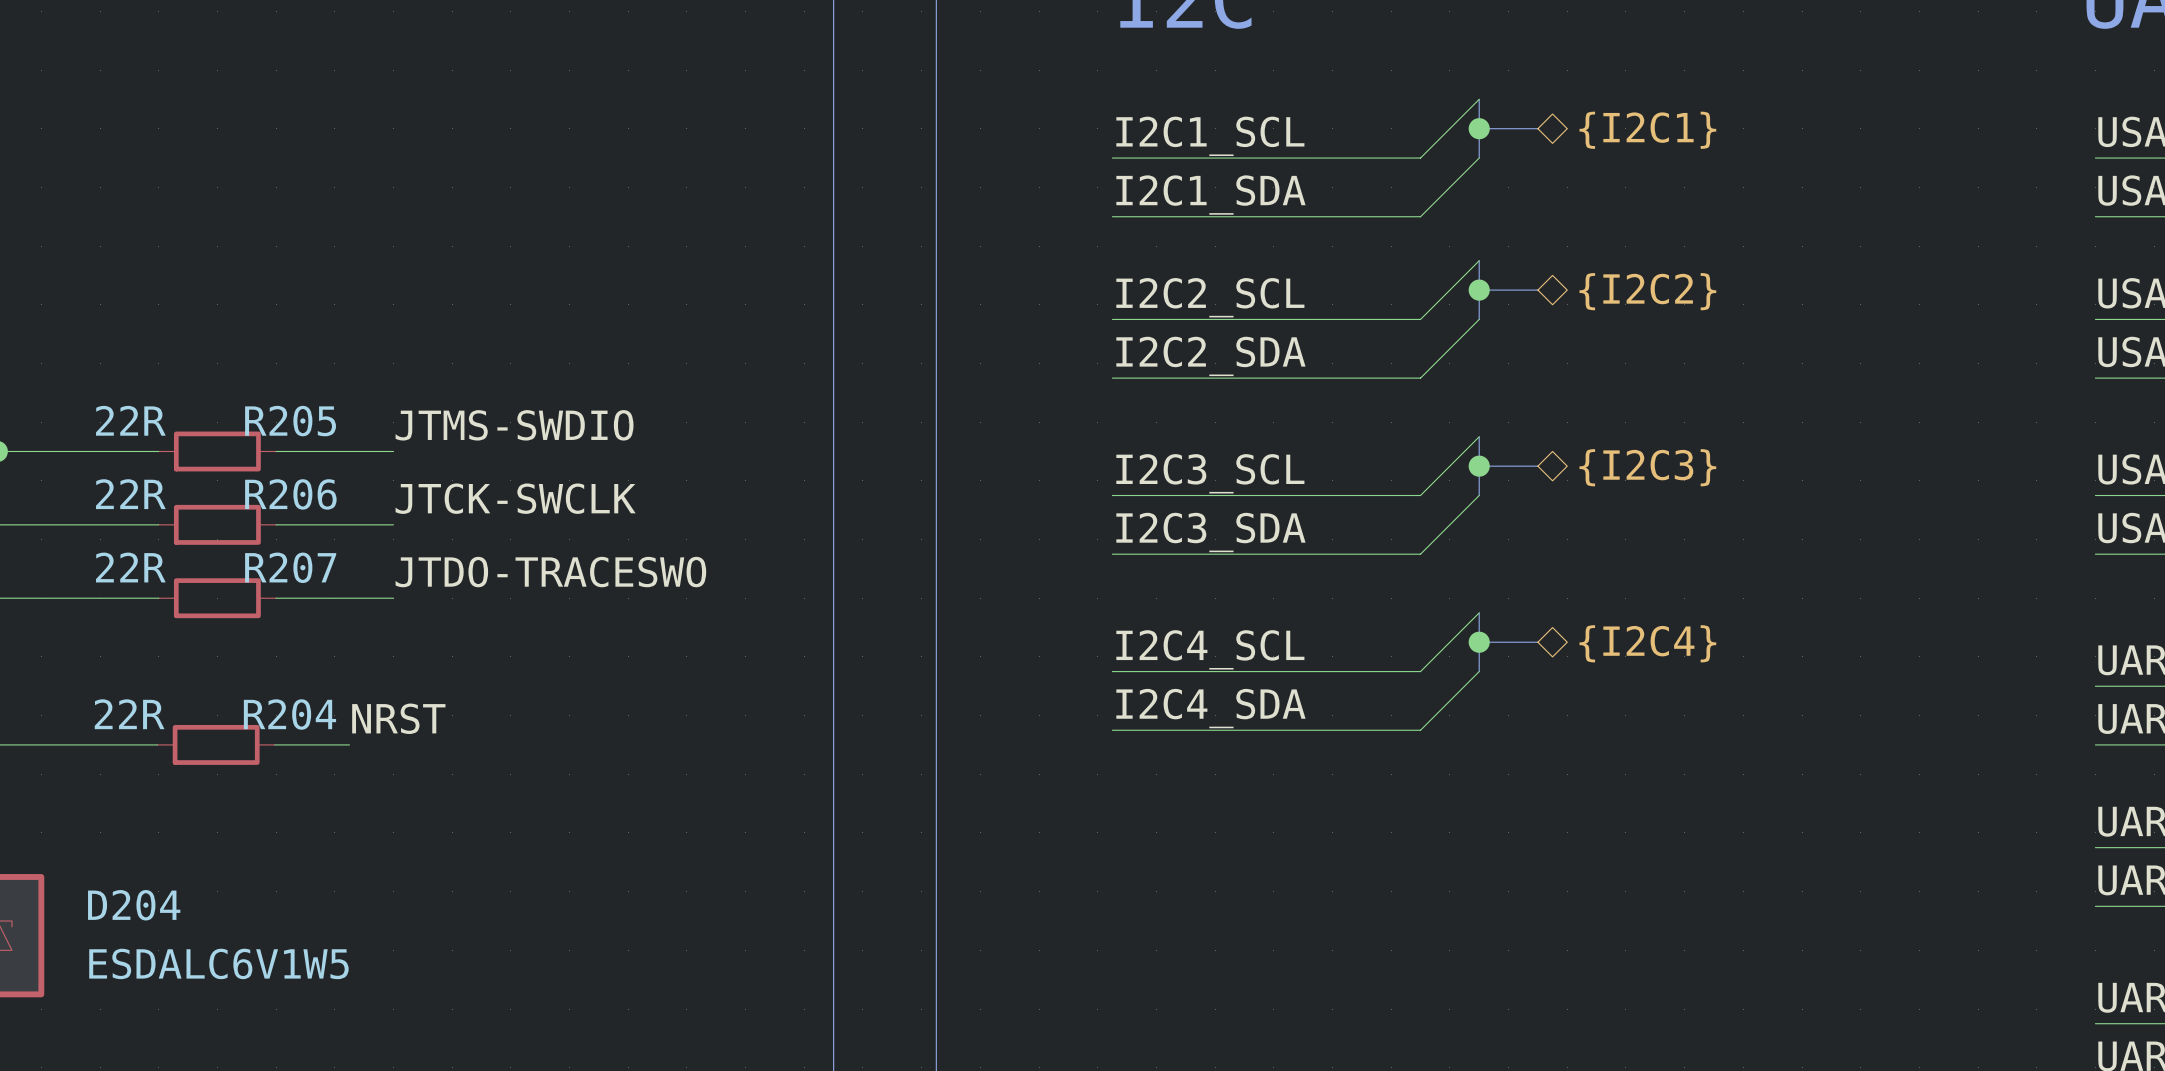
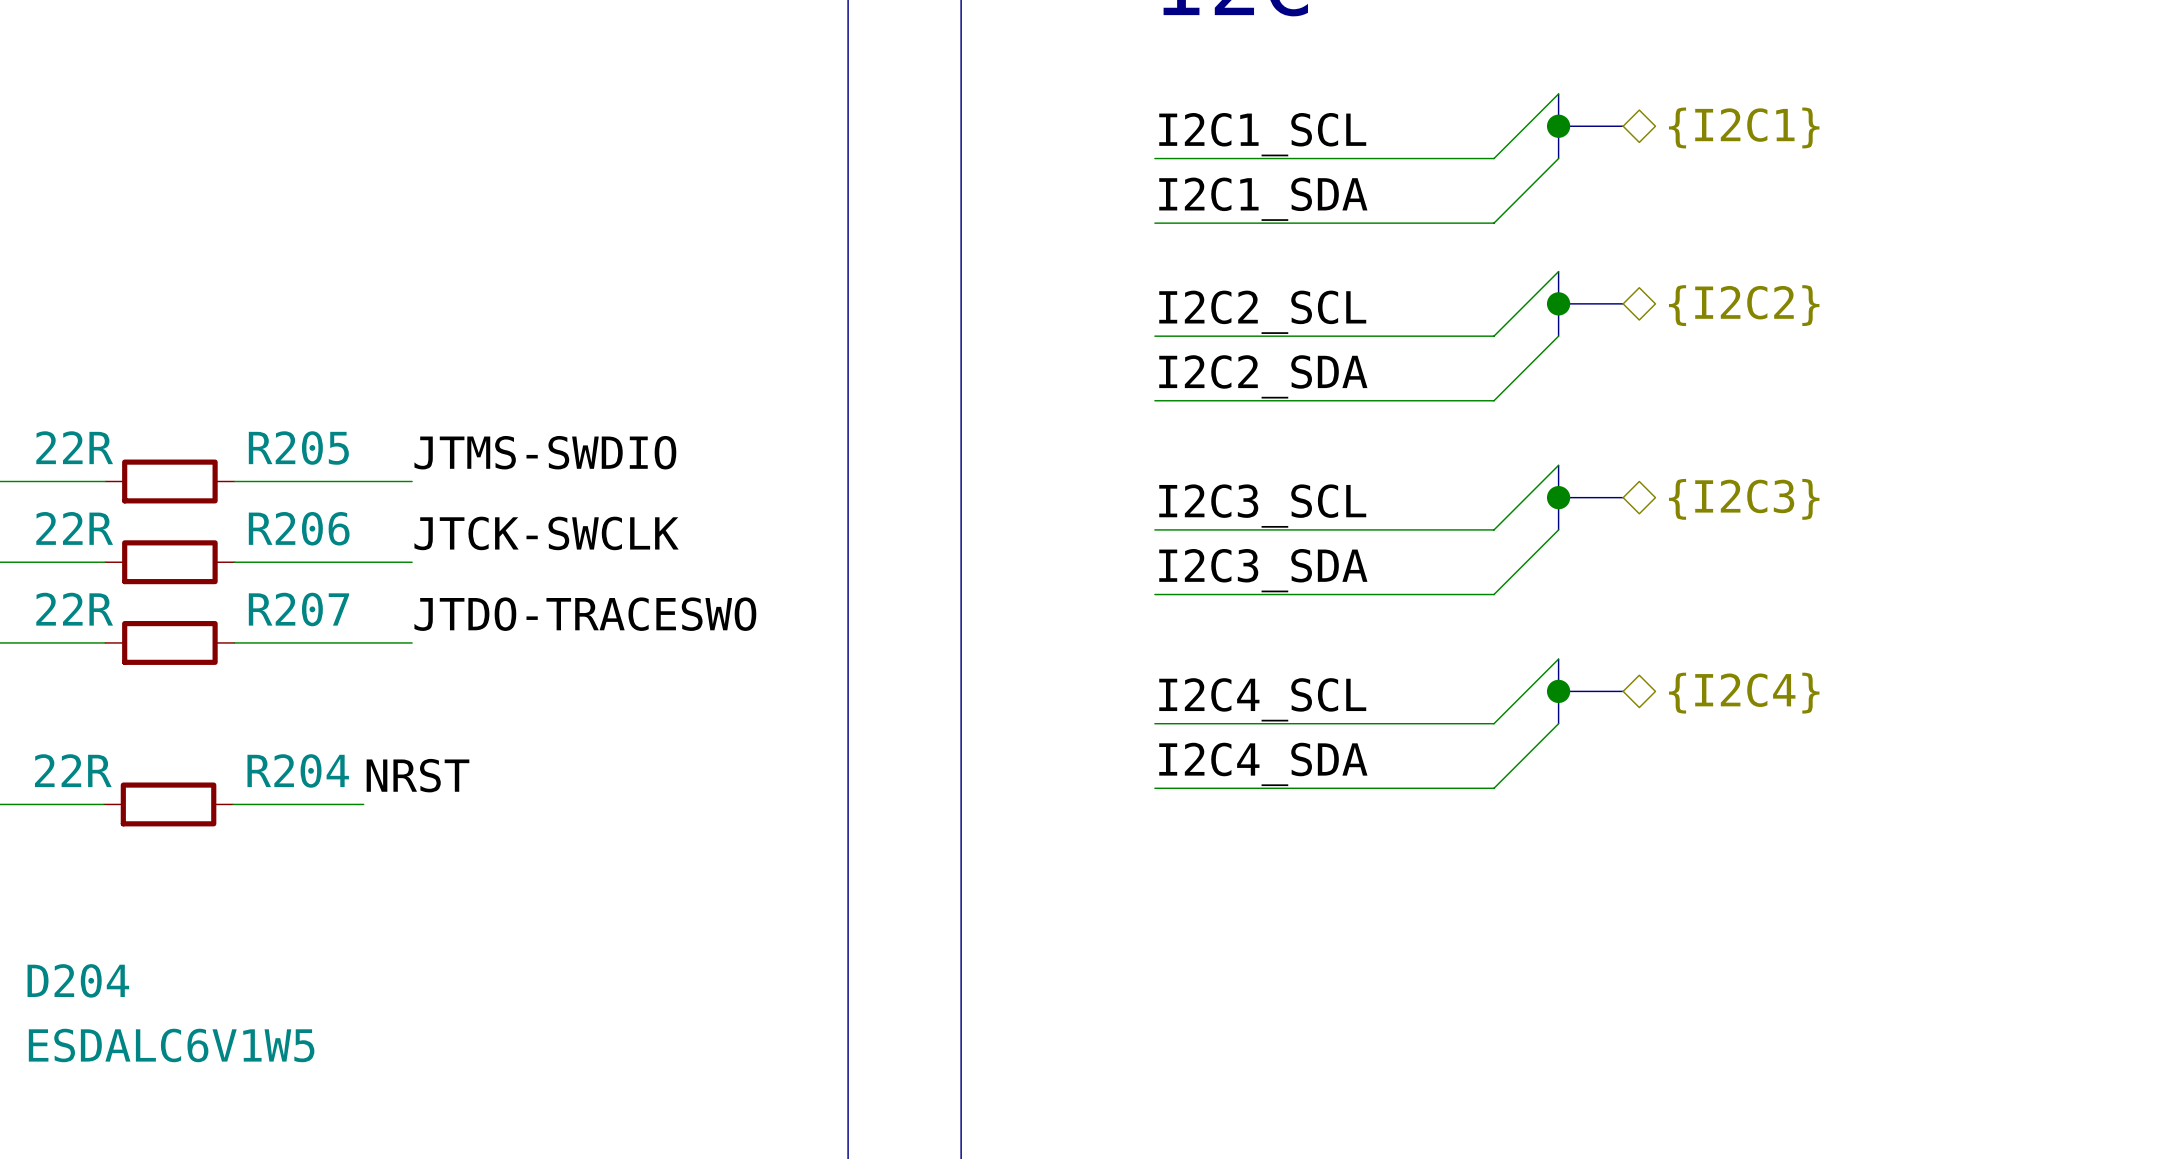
R205 name position: R205 (290, 421) -> R205 (298, 448)
label position: JTMS-SWDIO (514, 425) -> JTMS-SWDIO (545, 452)
wire: none -> (363, 481) (412, 481)
R206 name position: R206 (290, 494) -> R206 (299, 528)
label position: JTCK-SWCLK (515, 498) -> JTCK-SWCLK (546, 533)
wire: none -> (363, 562) (412, 562)
R207 name position: R207 (290, 567) -> R207 (298, 609)
label position: JTDO-TRACESWO (550, 572) -> JTDO-TRACESWO (585, 614)
wire: none -> (363, 642) (412, 642)
R204 name position: R204 (289, 714) -> R204 (298, 770)
label position: NRST (398, 718) -> NRST (418, 775)
wire: none -> (315, 804) (363, 804)

